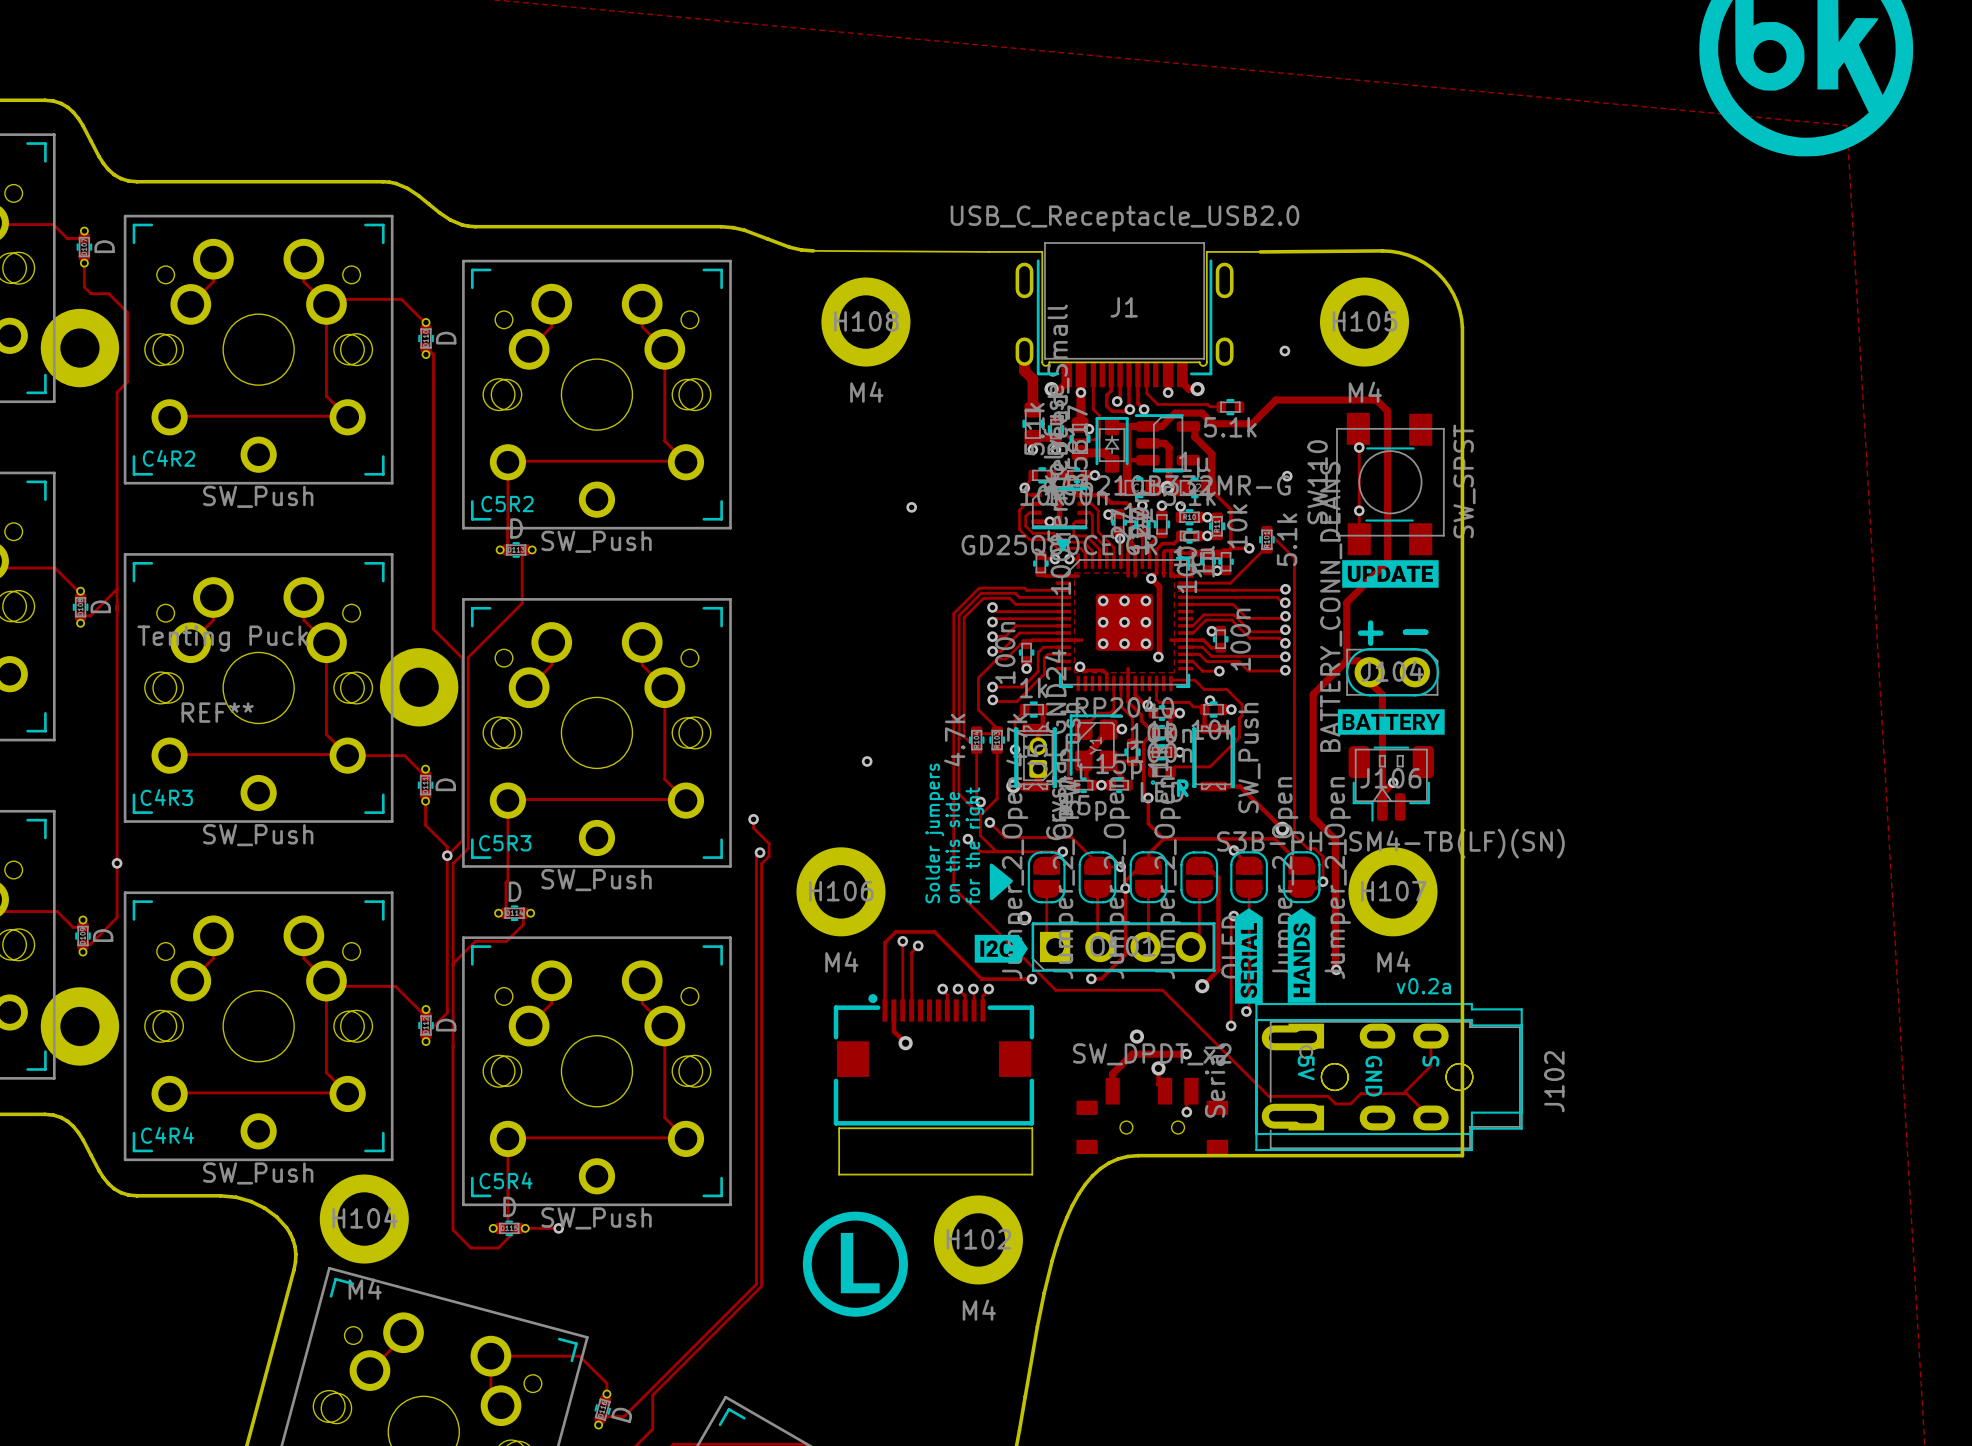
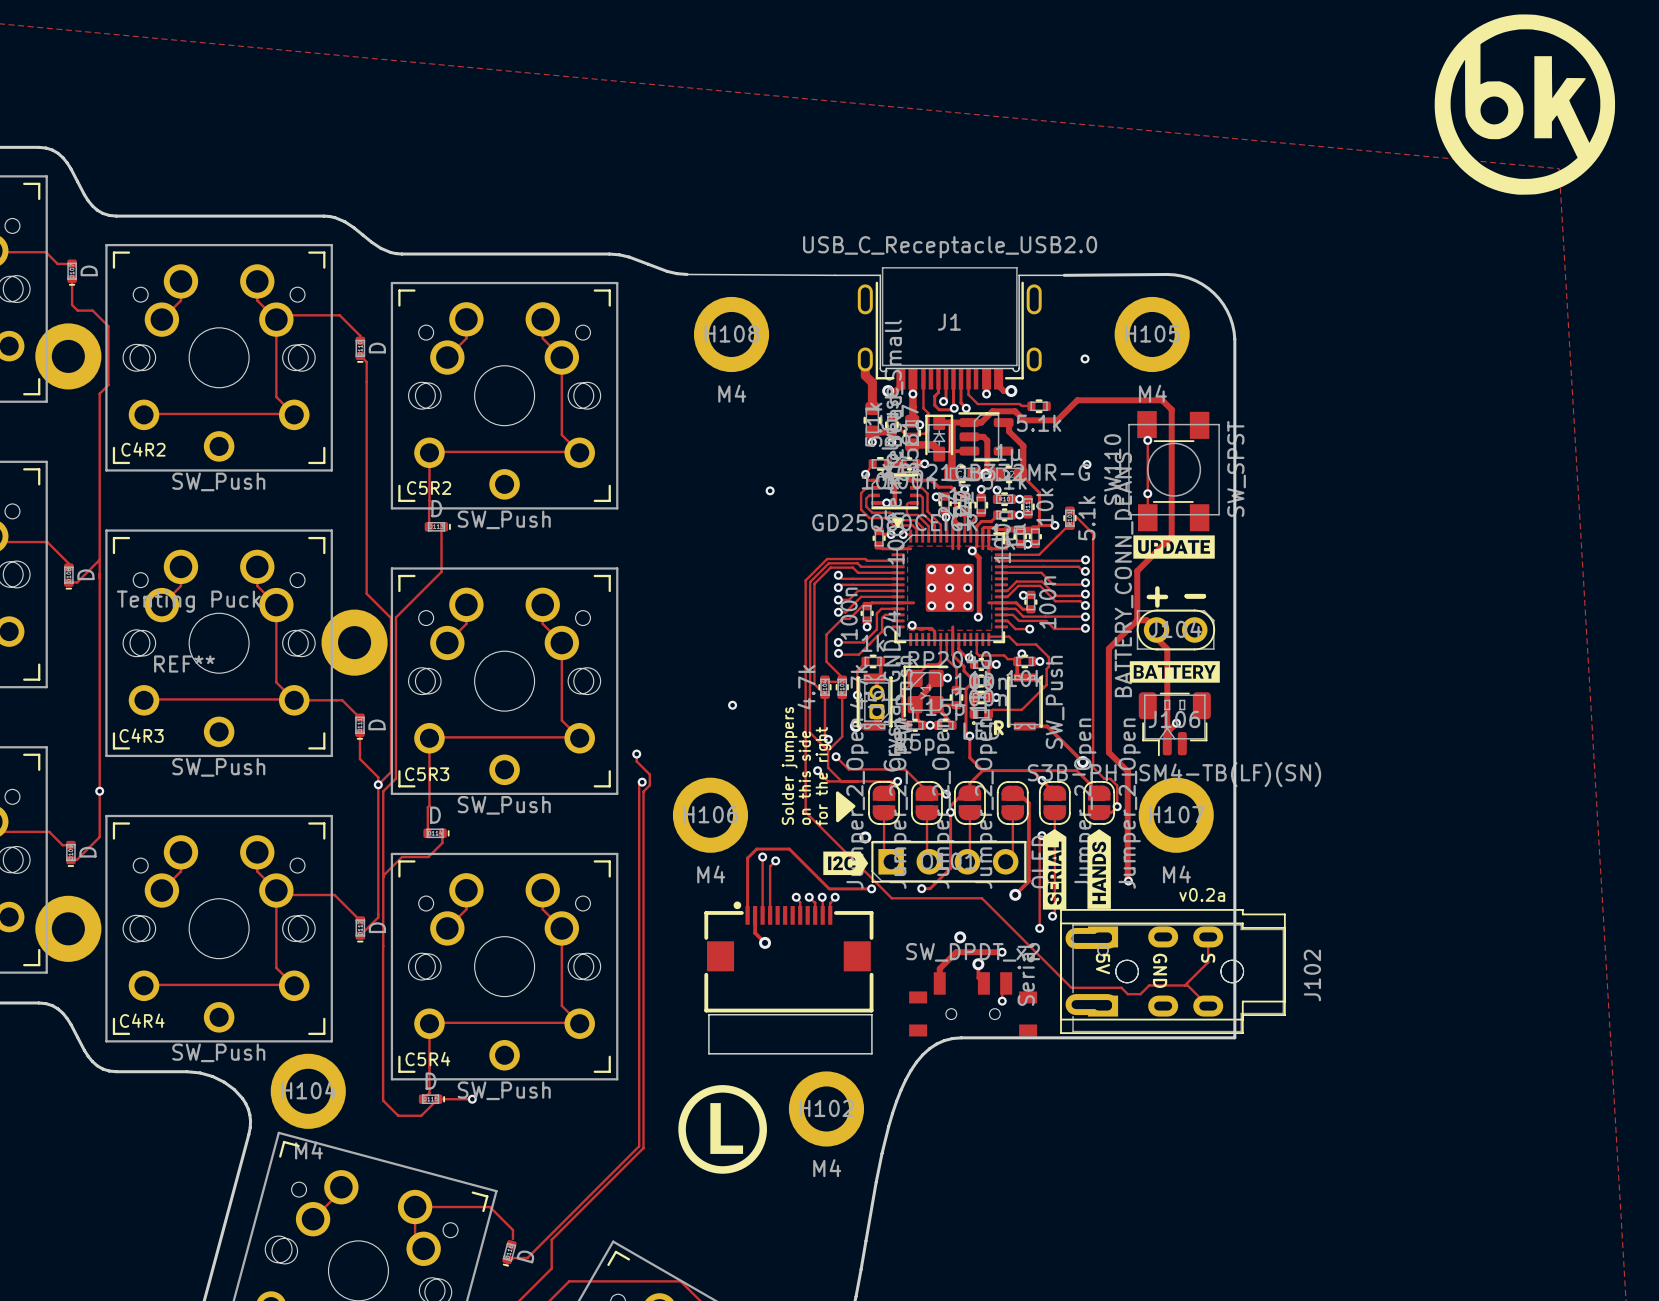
part footprint: [76, 226, 93, 268] -> [67, 259, 77, 286]
part footprint: [418, 318, 434, 359] -> [355, 336, 366, 363]
part footprint: [495, 542, 537, 558] -> [424, 521, 451, 532]
part footprint: [72, 586, 89, 628] -> [64, 563, 74, 590]
part footprint: [417, 764, 434, 806] -> [355, 713, 365, 740]
part footprint: [494, 905, 536, 922] -> [423, 828, 450, 839]
part footprint: [75, 915, 91, 957] -> [66, 840, 76, 867]
part footprint: [418, 1005, 434, 1046] -> [355, 916, 366, 943]
part footprint: [488, 1220, 530, 1237] -> [418, 1094, 446, 1105]
part footprint: [594, 1389, 612, 1430] -> [502, 1239, 517, 1267]

